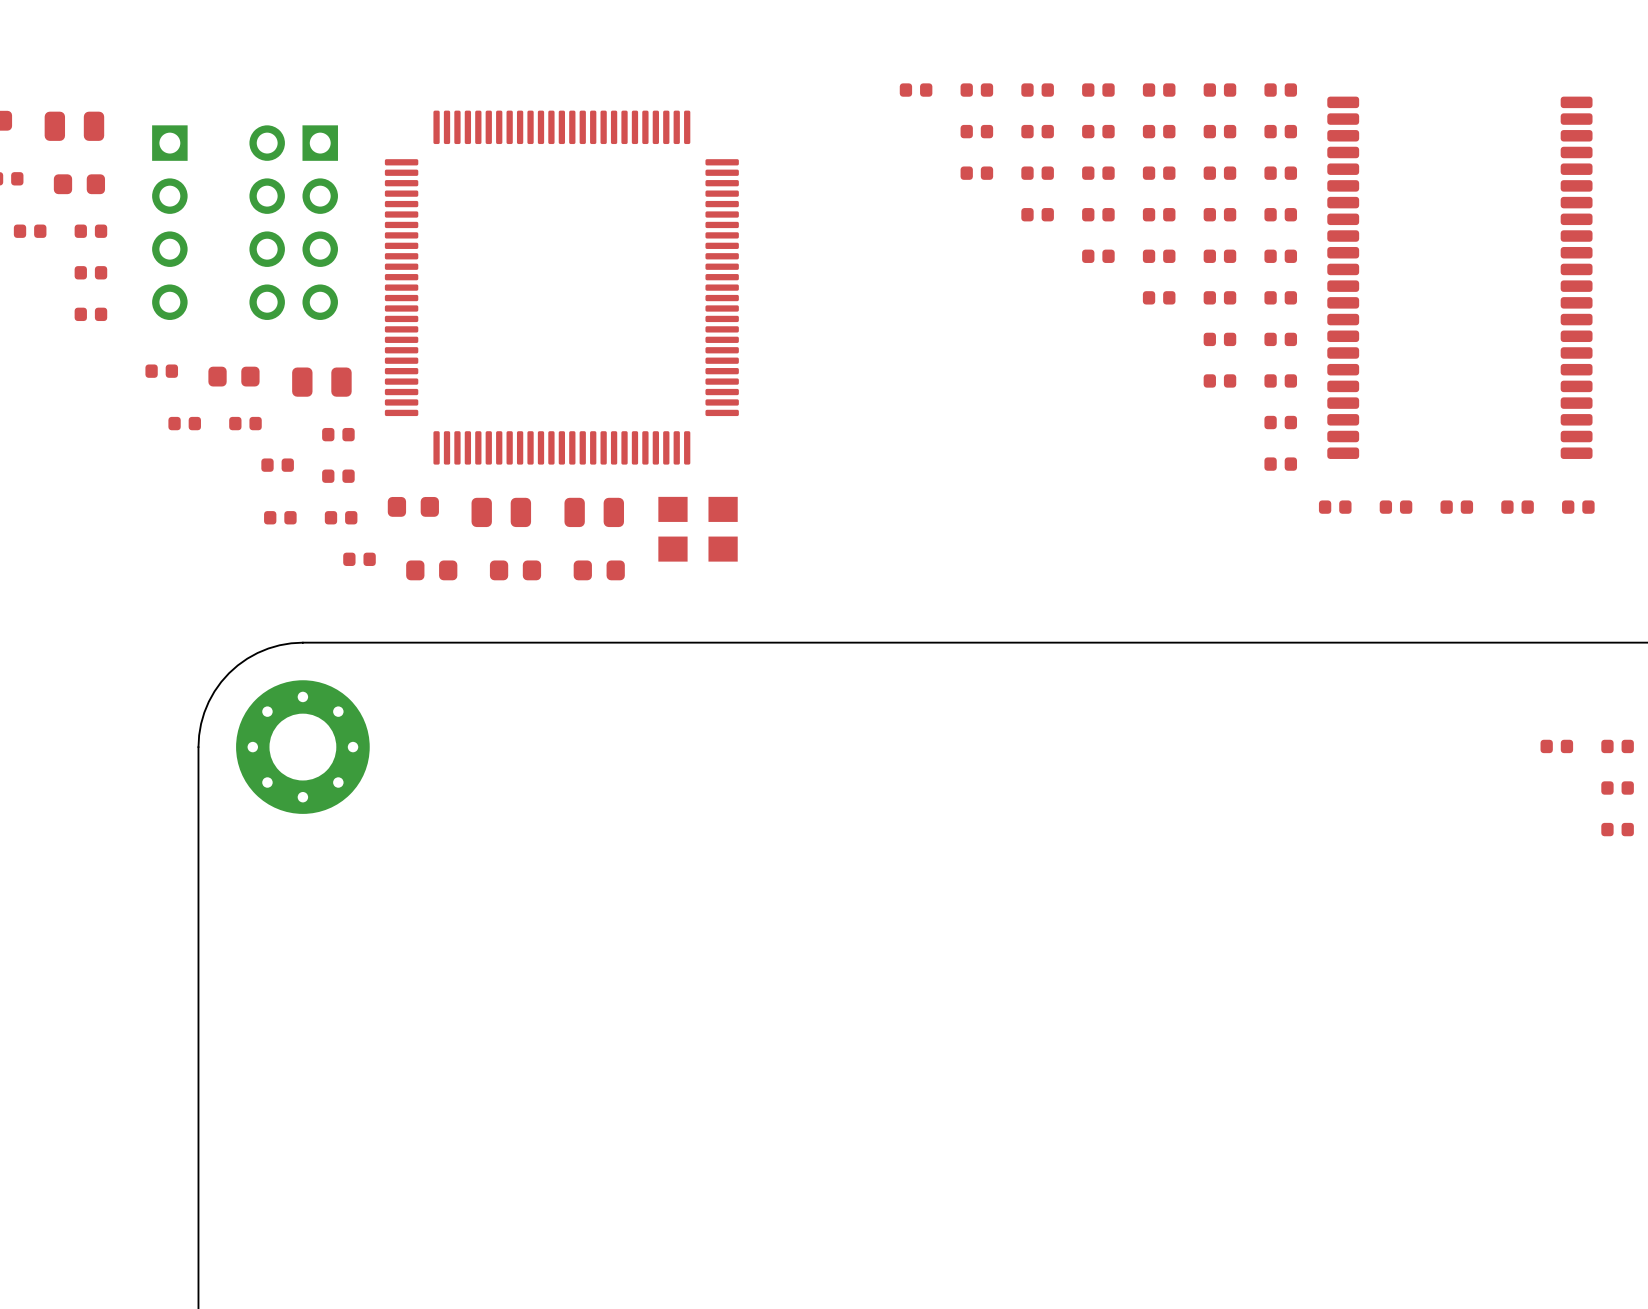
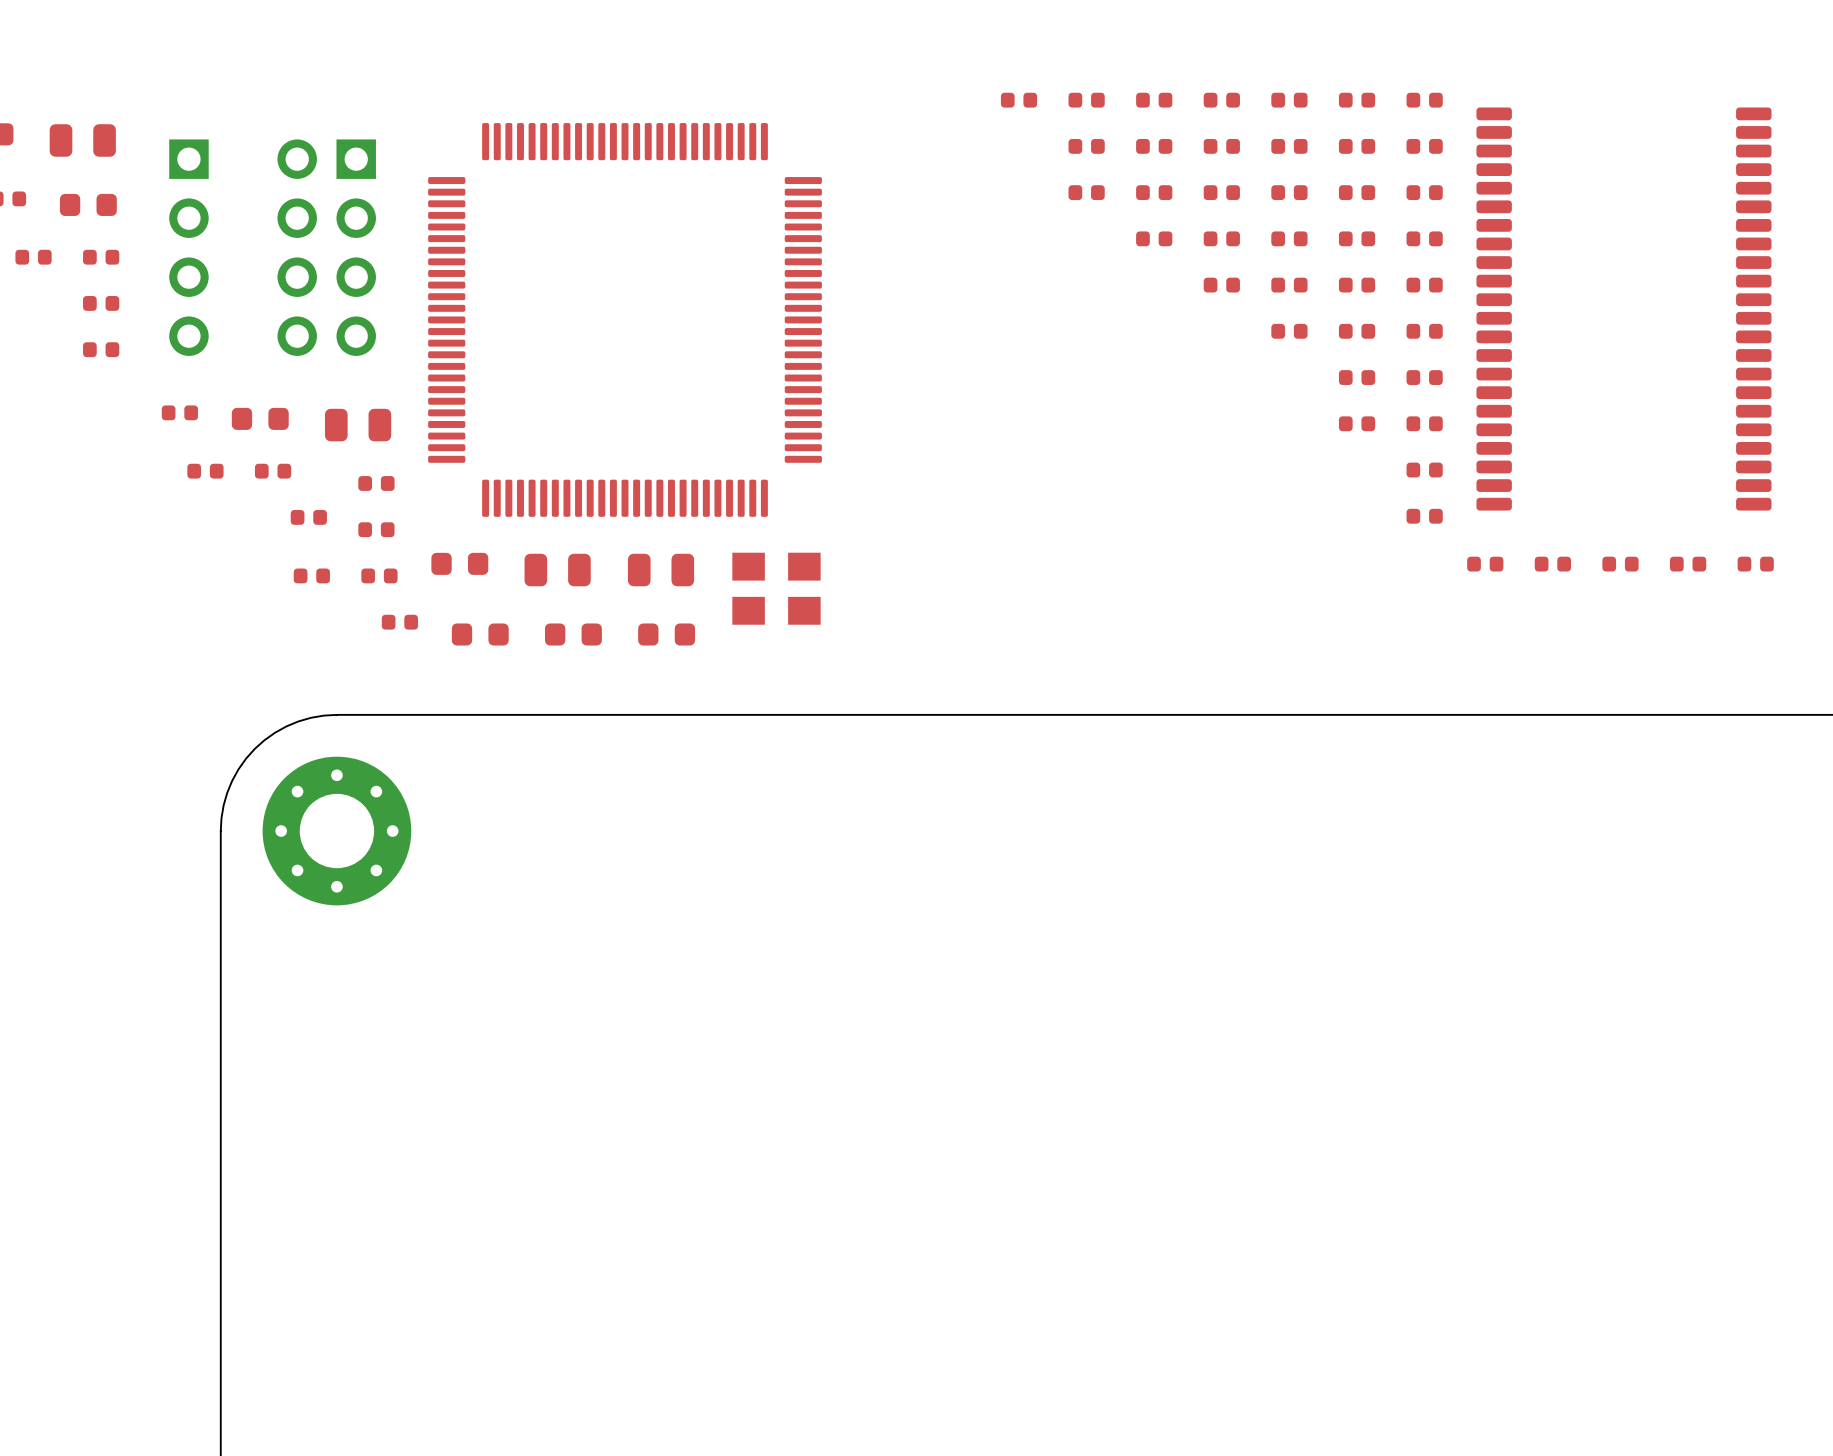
part: (1556, 746) -> none
part: (1617, 746) -> none
part: (1617, 788) -> none
part: (1617, 829) -> none

